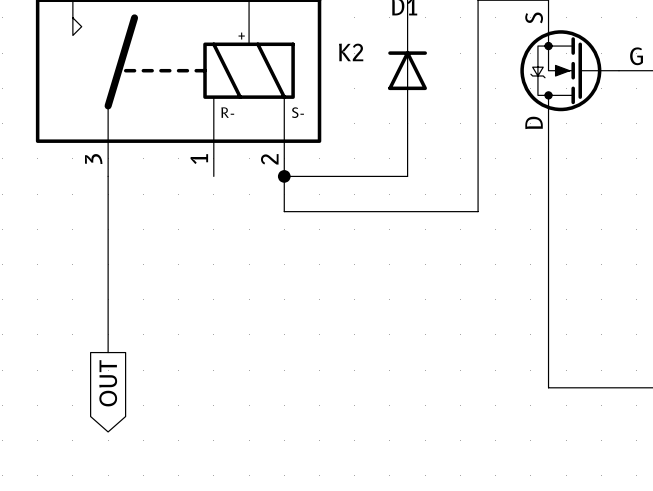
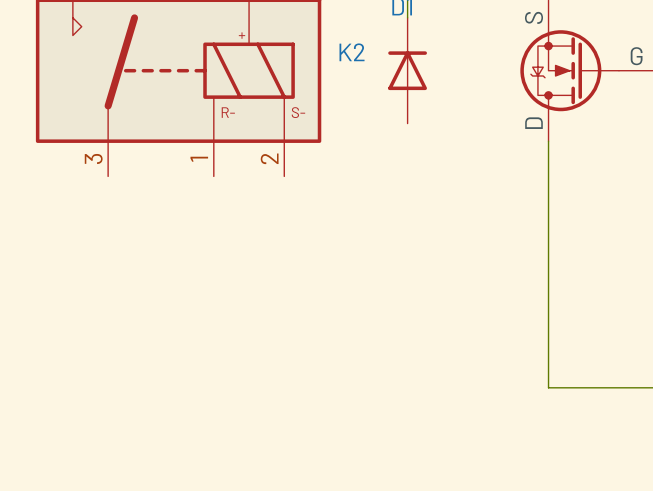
wire: (548, 0) (478, 0) (478, 211) (284, 211) (284, 176) (407, 176) (407, 123) -> none
wire: (108, 176) (108, 352) -> none
junction: (284, 176) -> none
global label: OUT (108, 383) -> none

